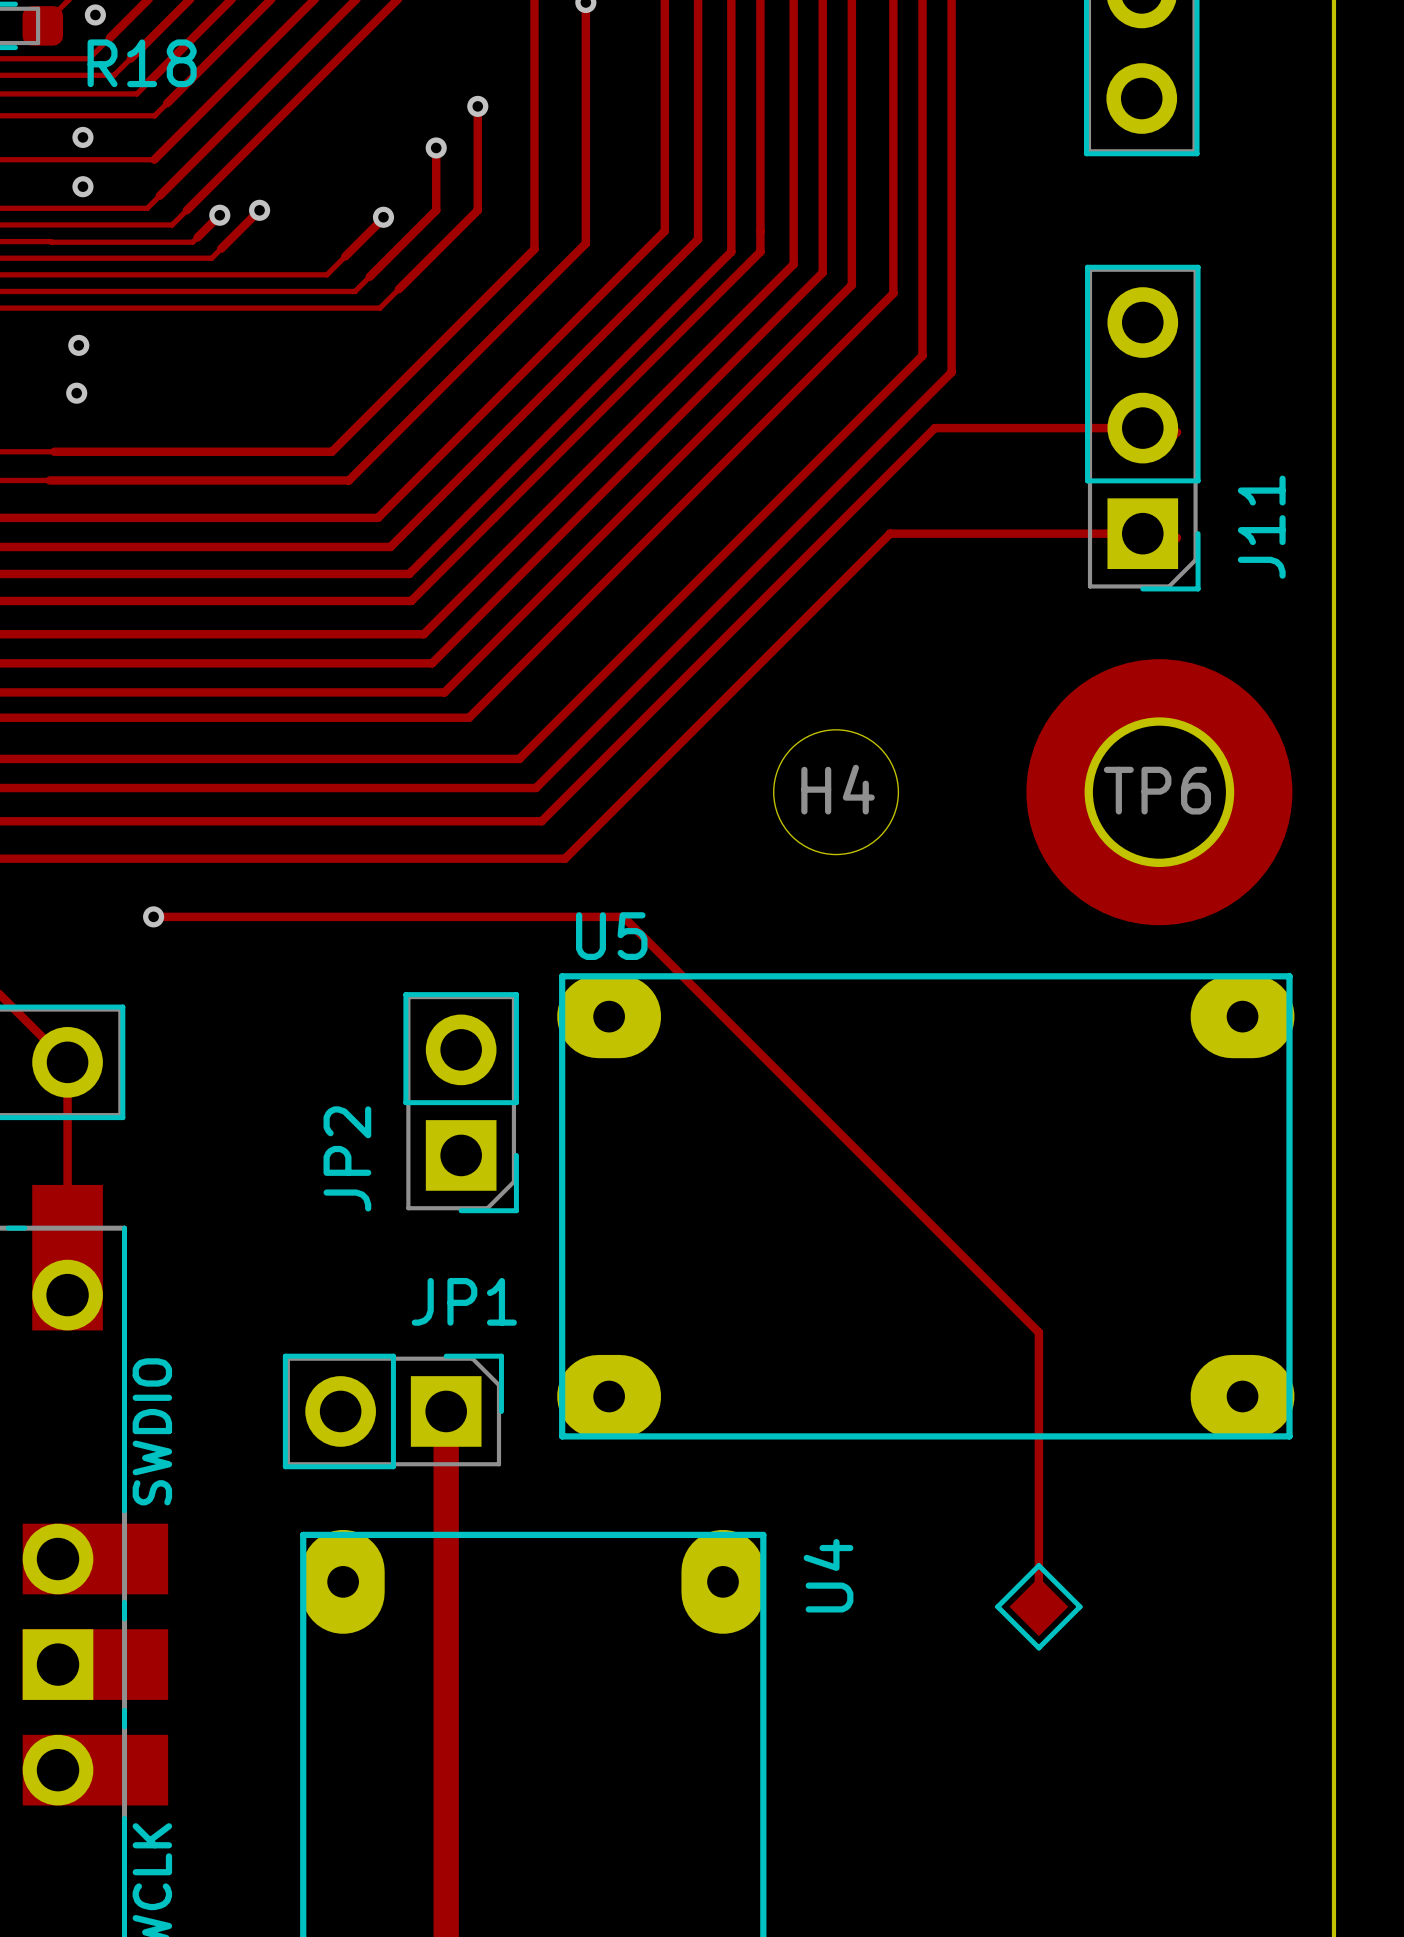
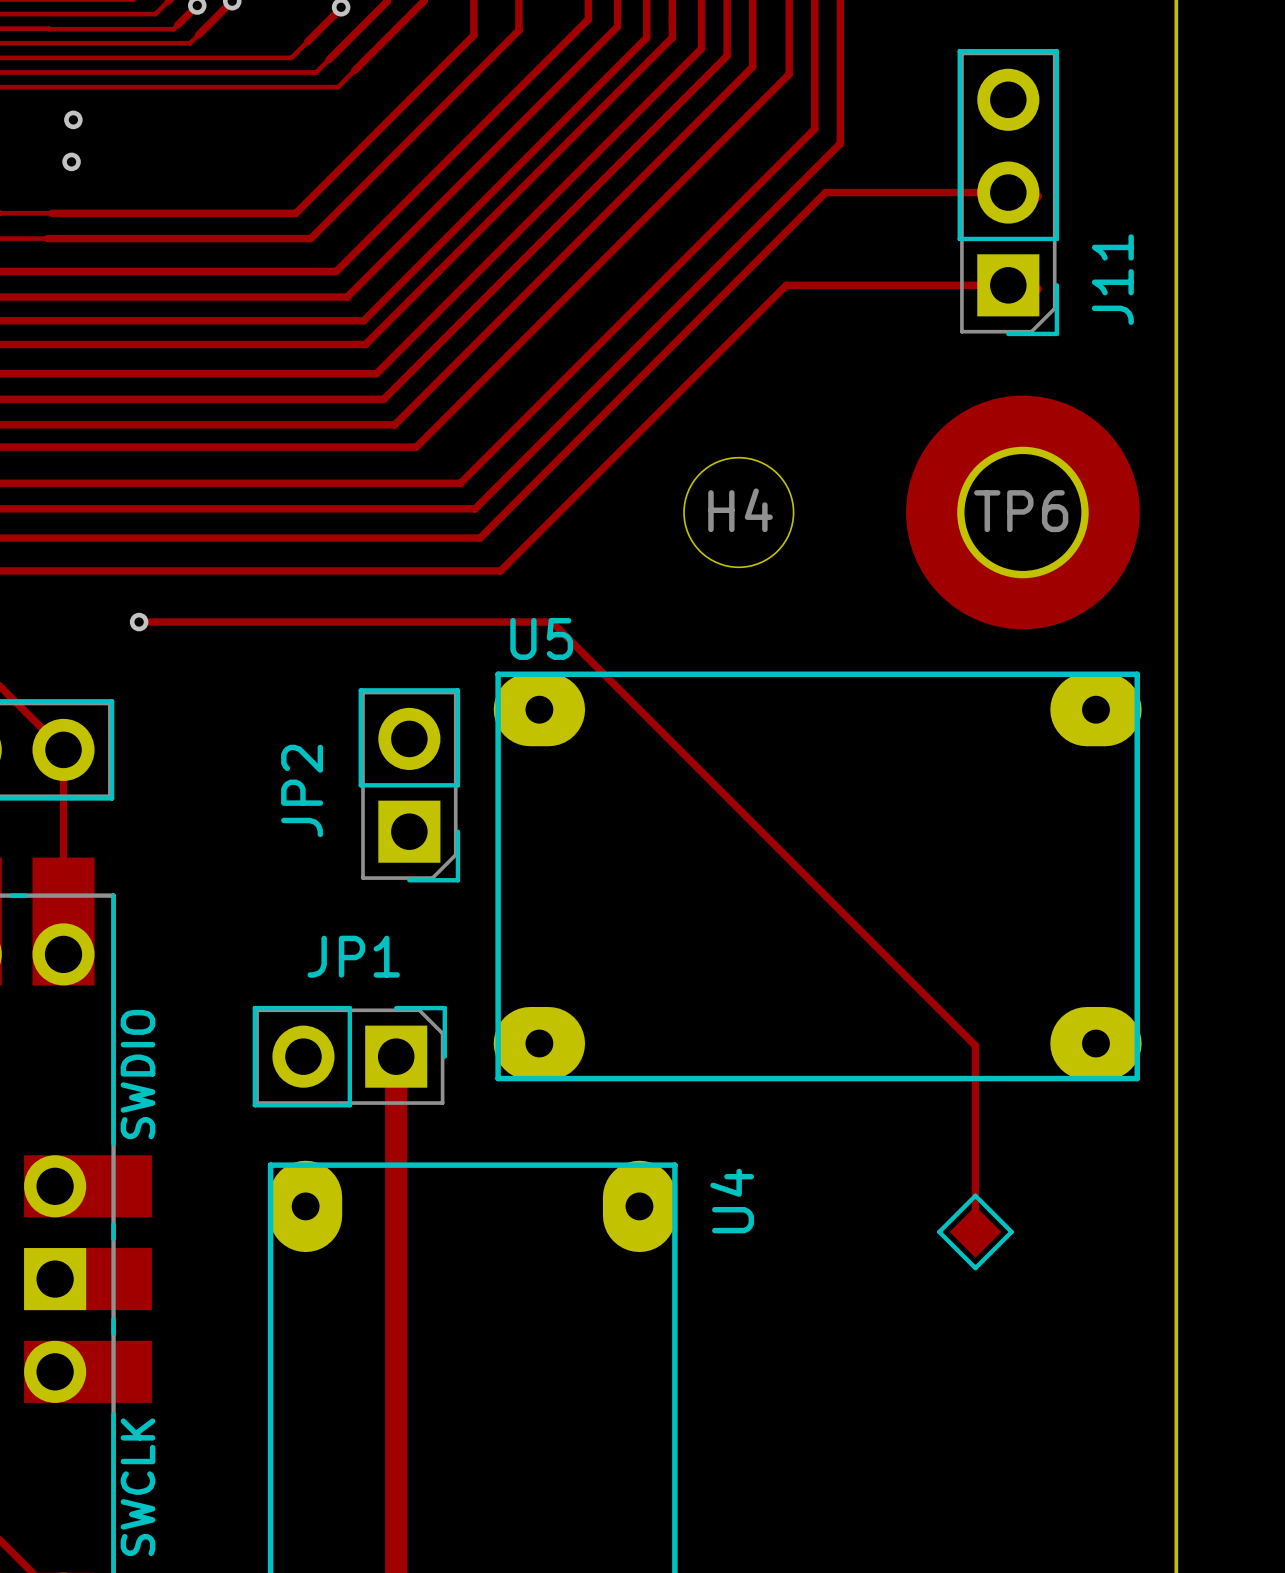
JP2 name position: JP2 (347, 1158) -> JP2 (302, 790)
JP1 name position: JP1 (464, 1301) -> JP1 (353, 956)
track: (1038, 1332) (1038, 1606) -> (917, 987) (975, 1045) (975, 1231)
part position: (1038, 1606) -> (975, 1231)

